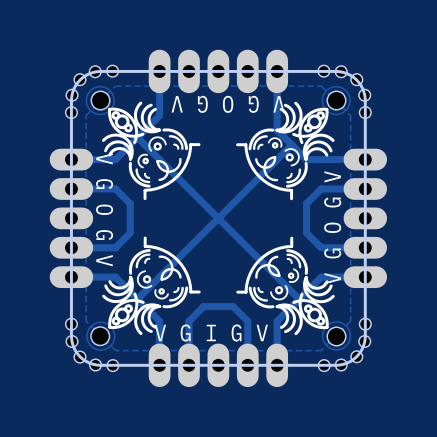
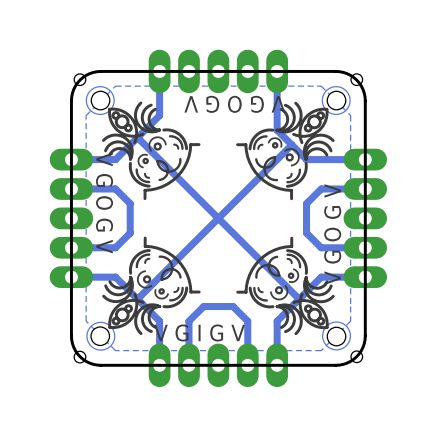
hole: (95, 71) -> none
hole: (112, 71) -> none
hole: (323, 71) -> none
hole: (341, 71) -> none
hole: (72, 95) -> none
hole: (364, 95) -> none
hole: (71, 112) -> none
hole: (365, 112) -> none
hole: (71, 324) -> none
hole: (365, 324) -> none
hole: (72, 341) -> none
hole: (364, 341) -> none
hole: (95, 365) -> none
hole: (112, 365) -> none
hole: (324, 365) -> none
hole: (341, 365) -> none

